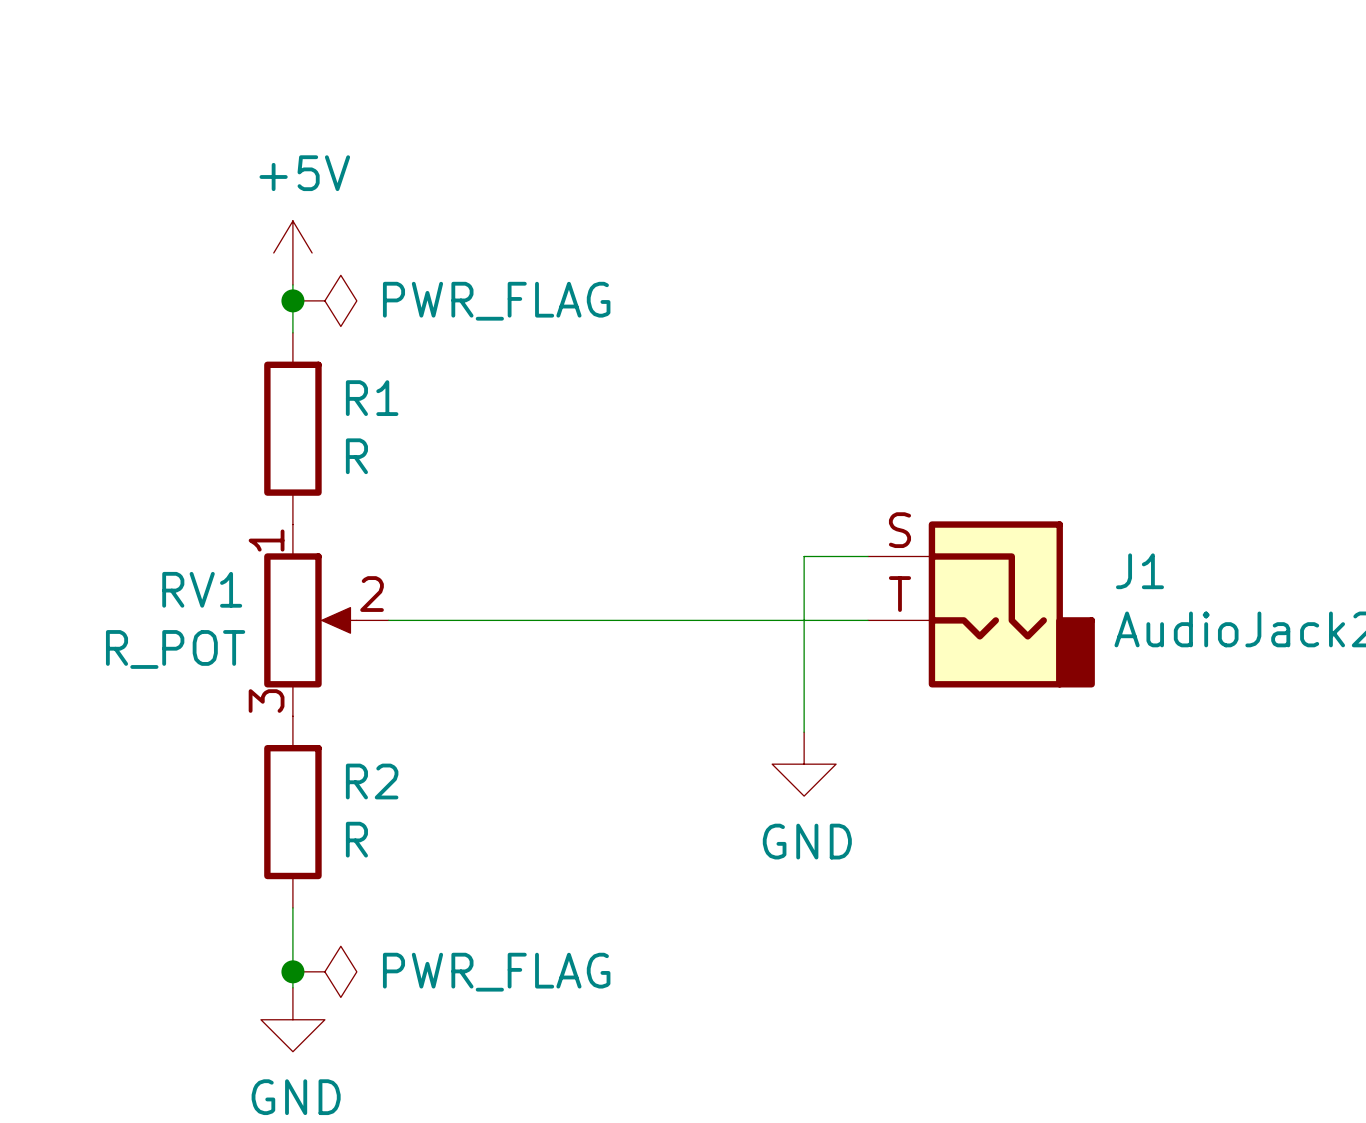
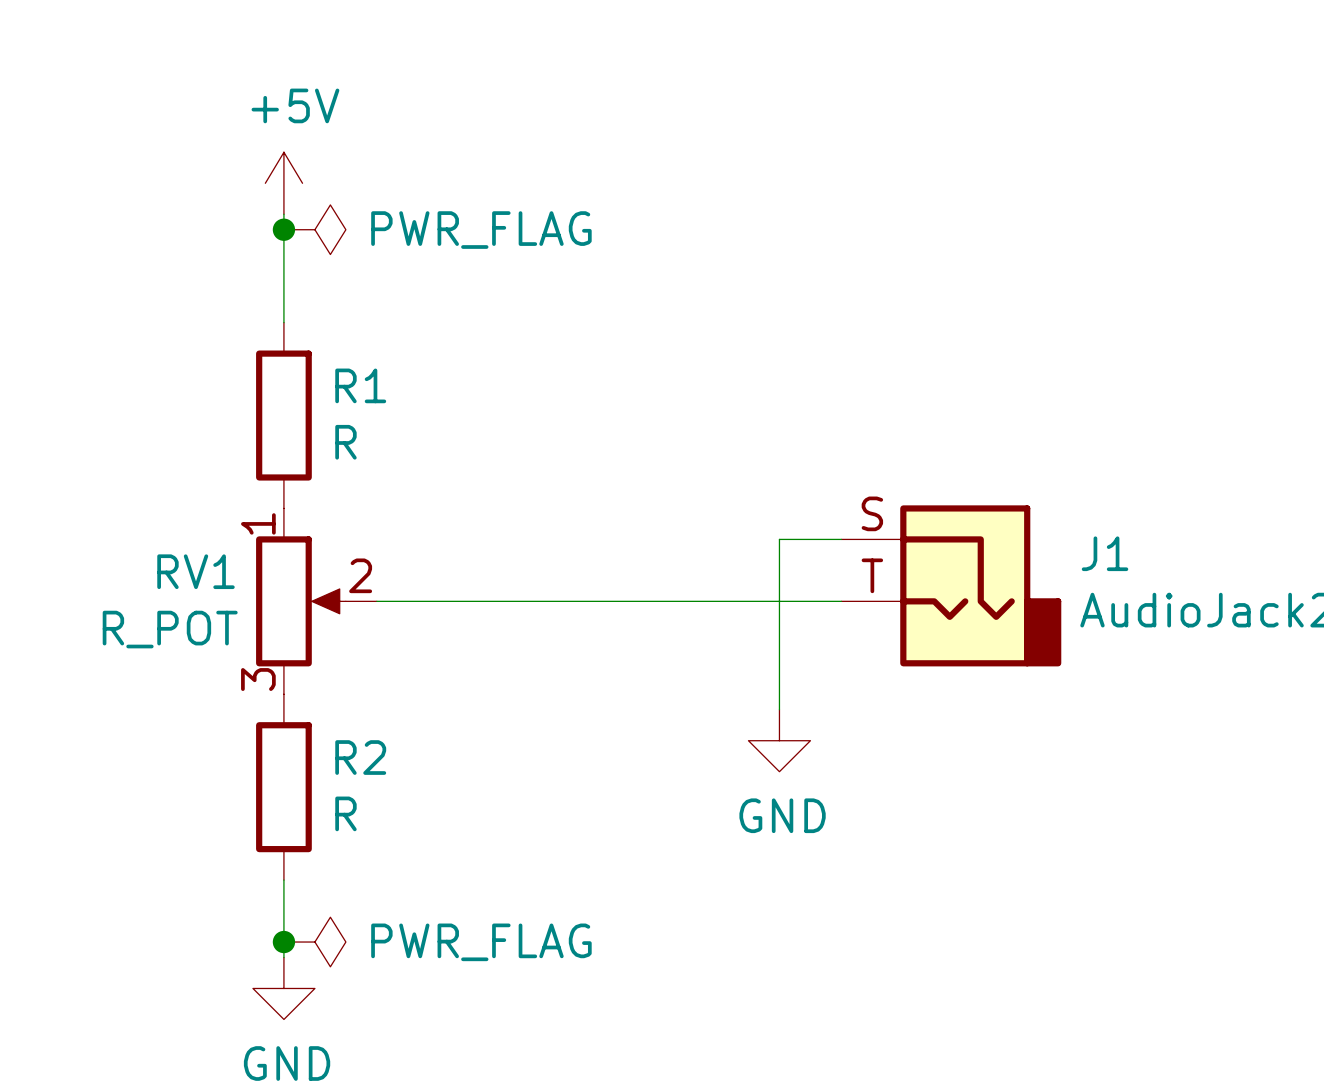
power symbol position: +5V (292, 252) -> +5V (283, 183)
junction position: (292, 300) -> (283, 229)
power symbol position: PWR_FLAG (324, 300) -> PWR_FLAG (314, 229)

